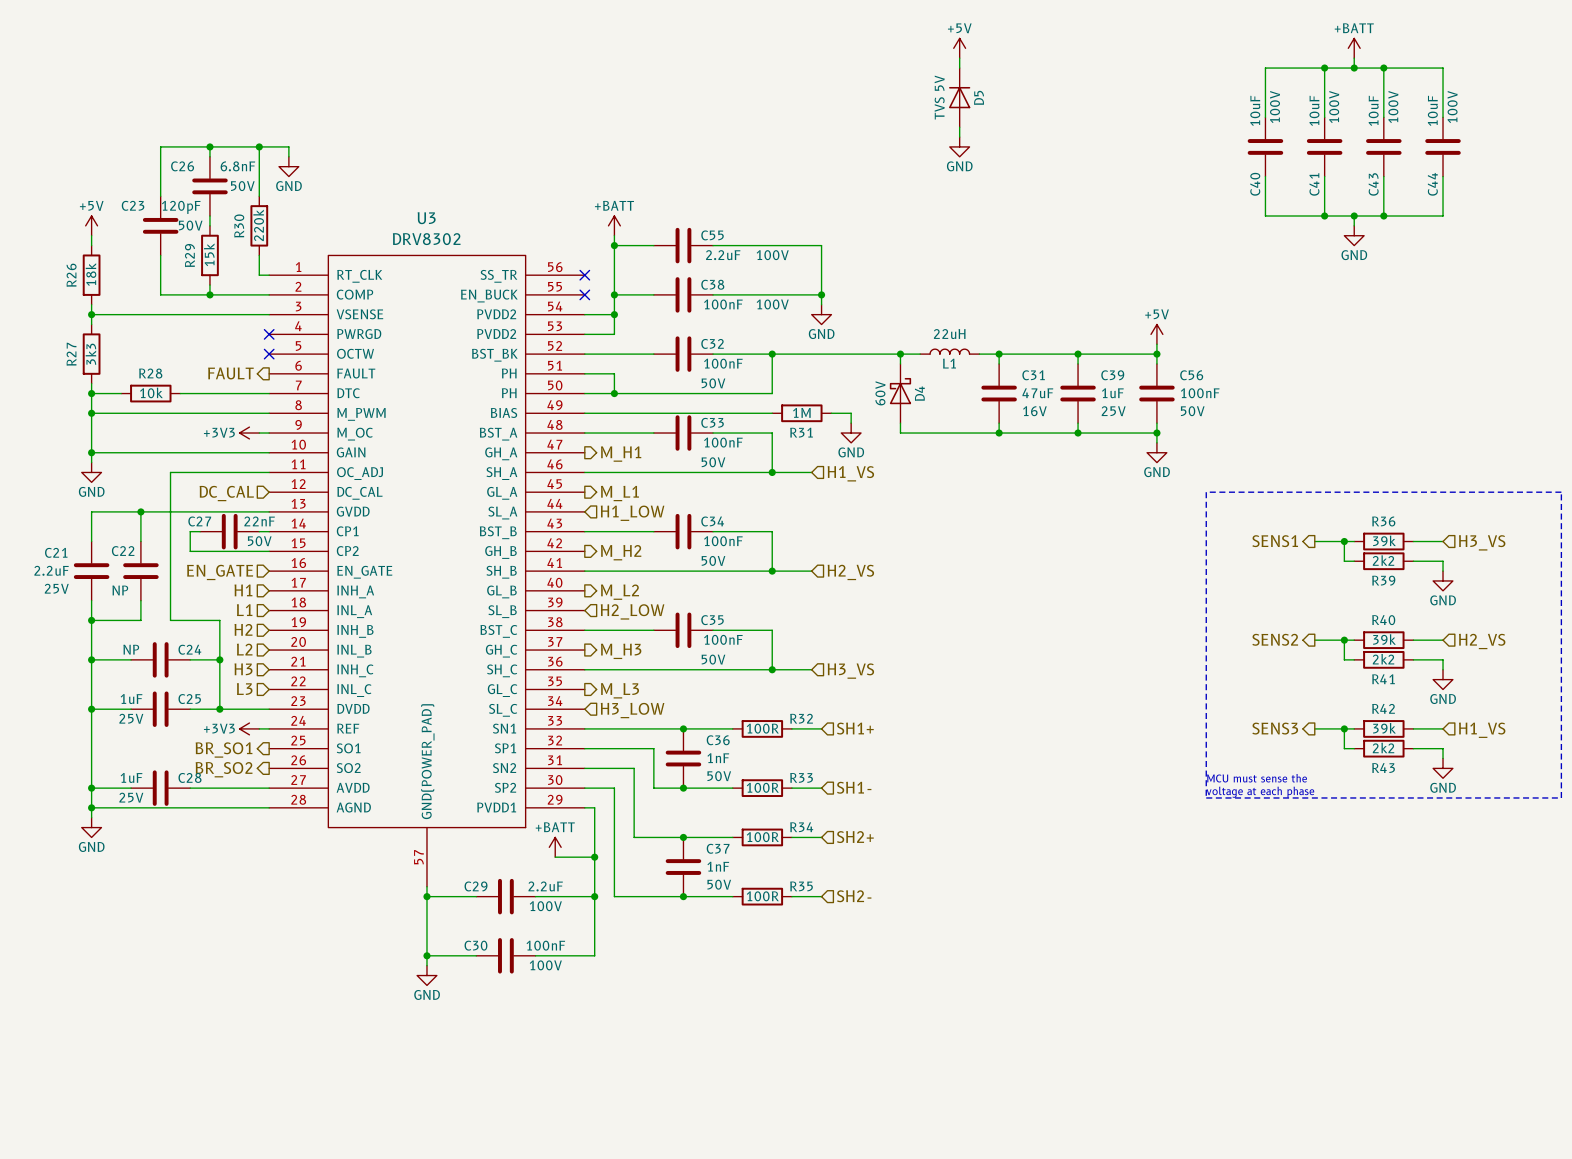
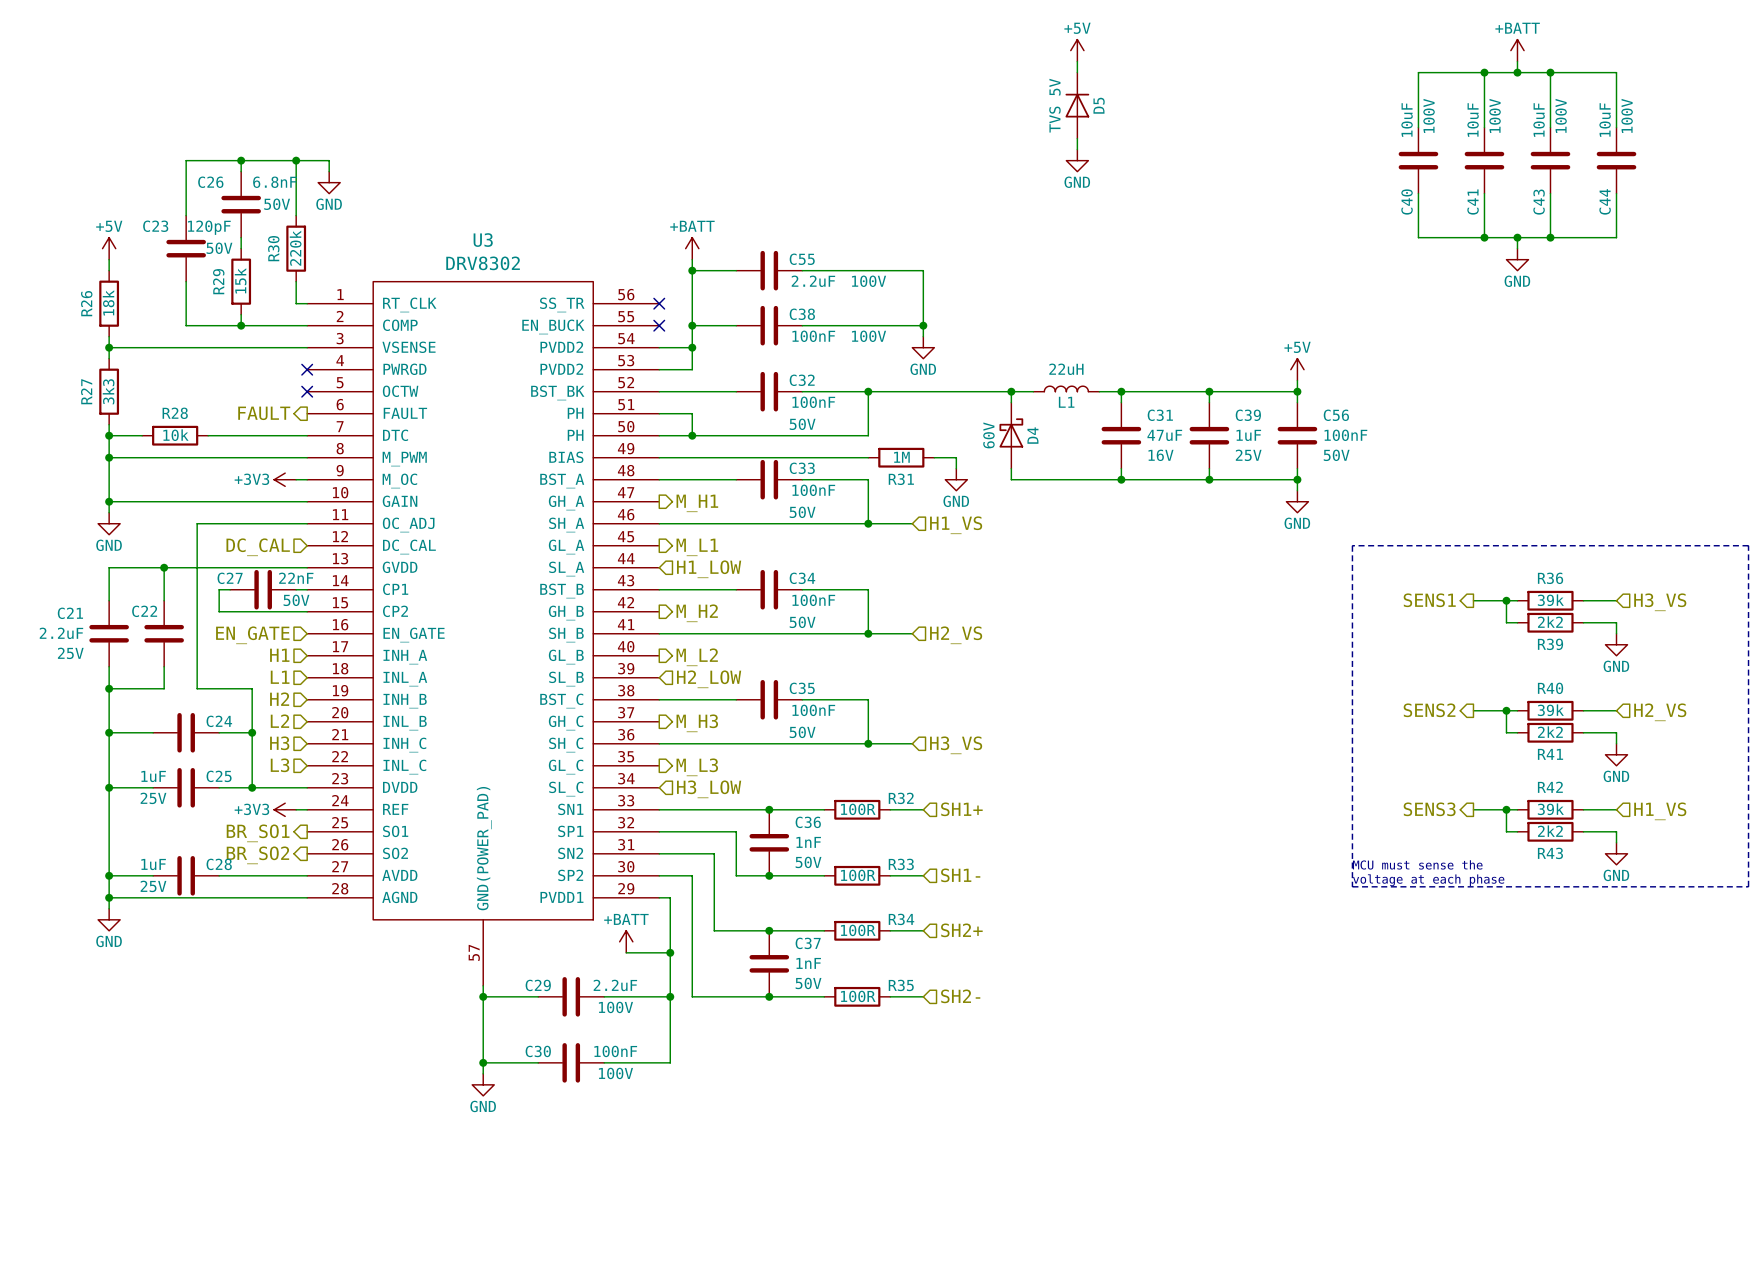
C22 value: NP (120, 590) -> none
C24 value: NP (131, 649) -> none

